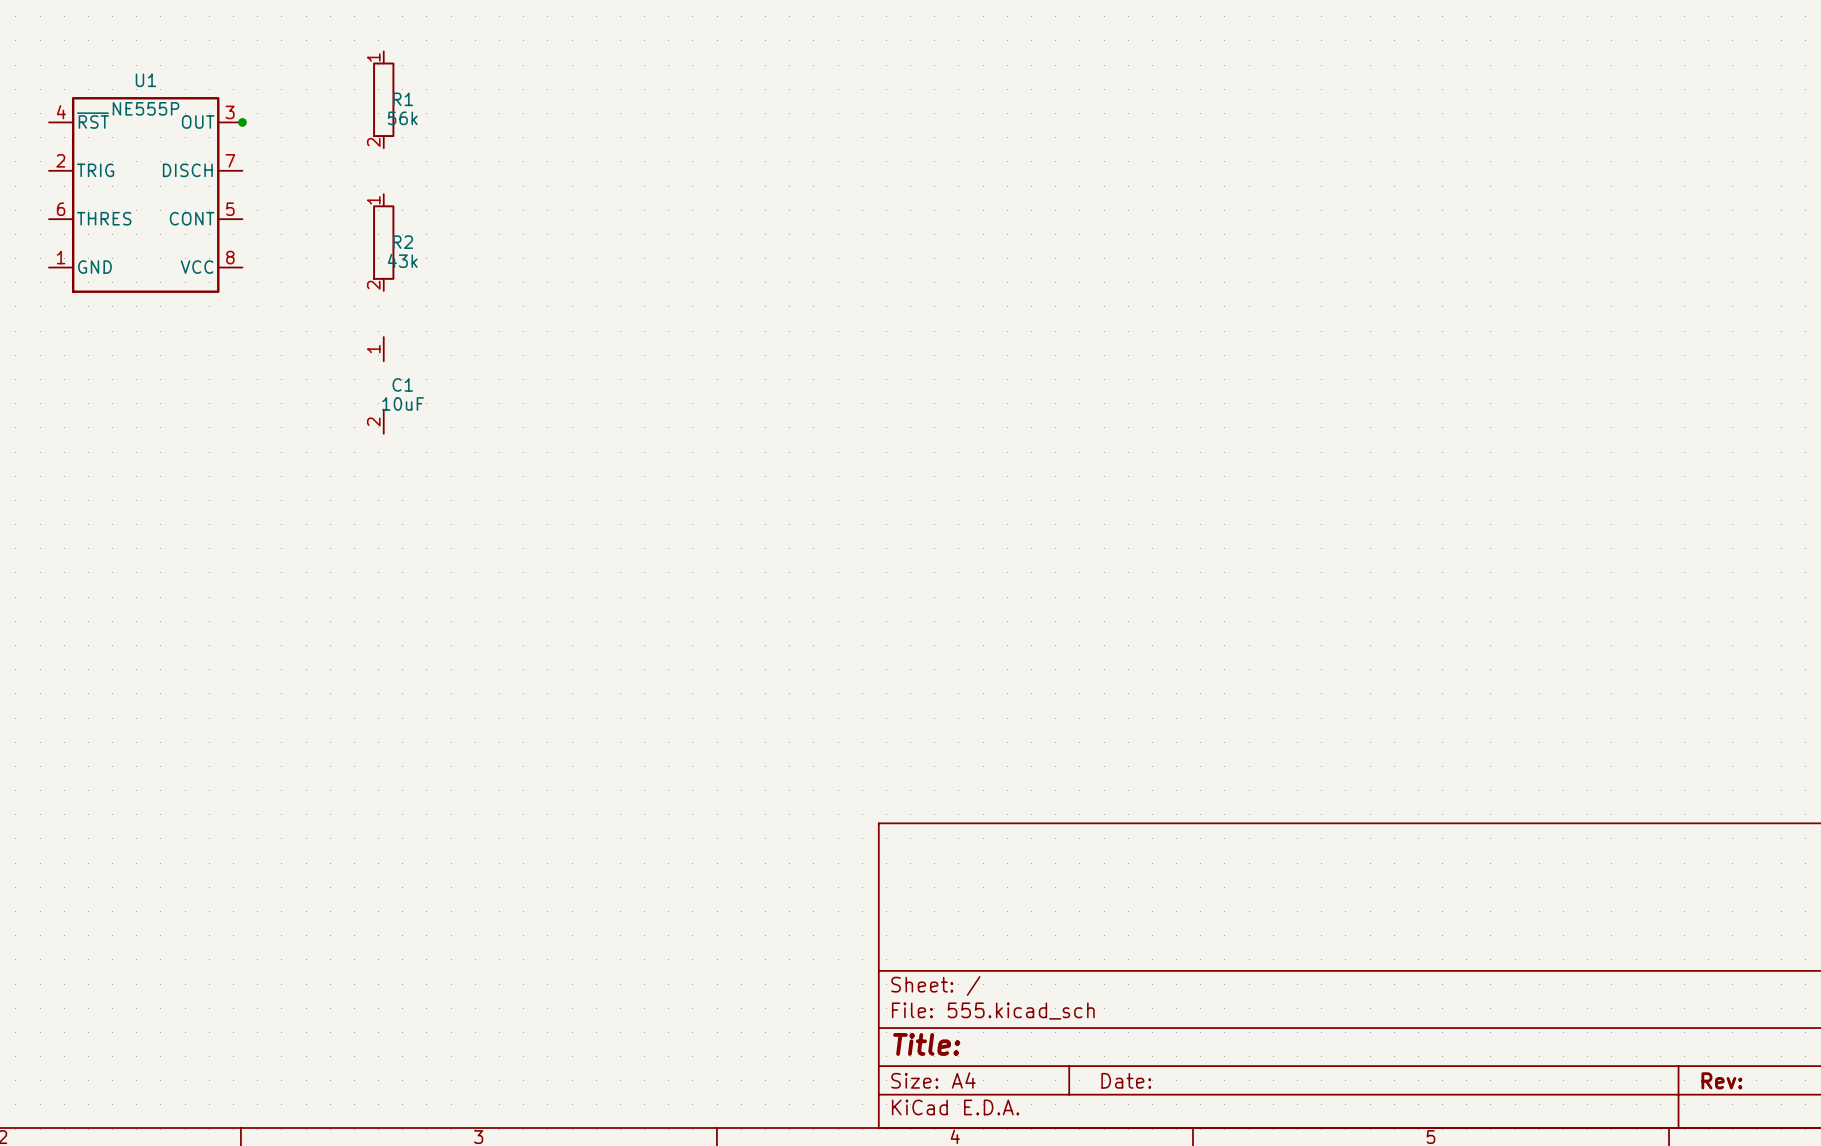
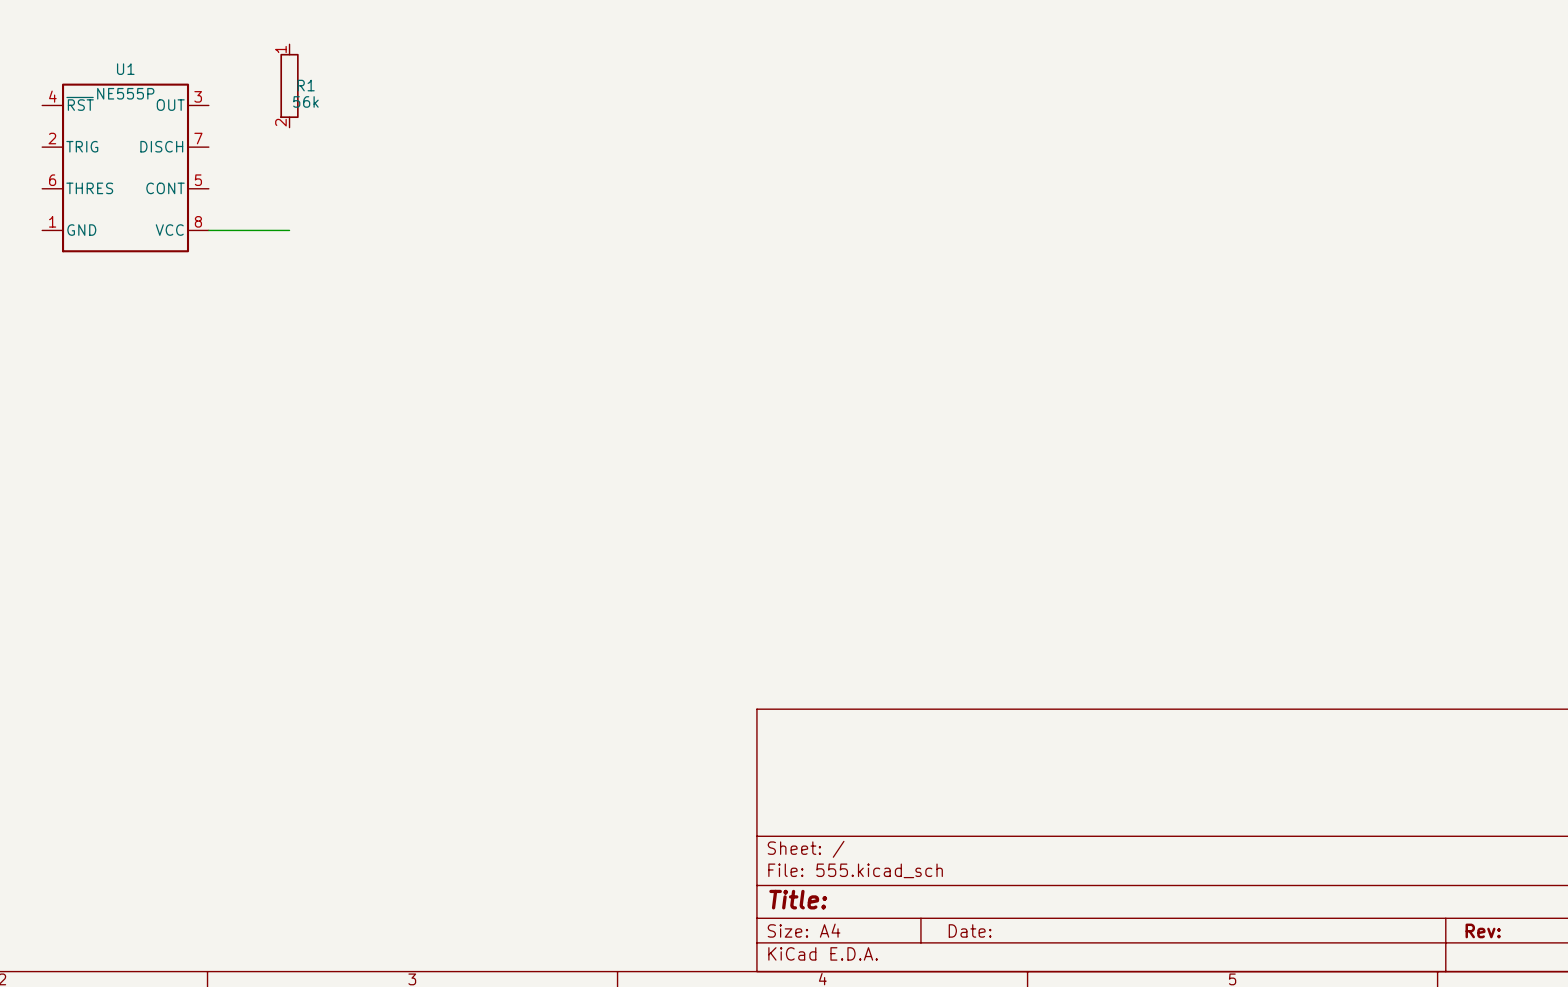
R1 position: (383, 99) -> (289, 85)
junction: (242, 122) -> none
R2: 43k (383, 242) -> none
wire: none -> (208, 230) (289, 230)
C1: 10uF (383, 385) -> none

